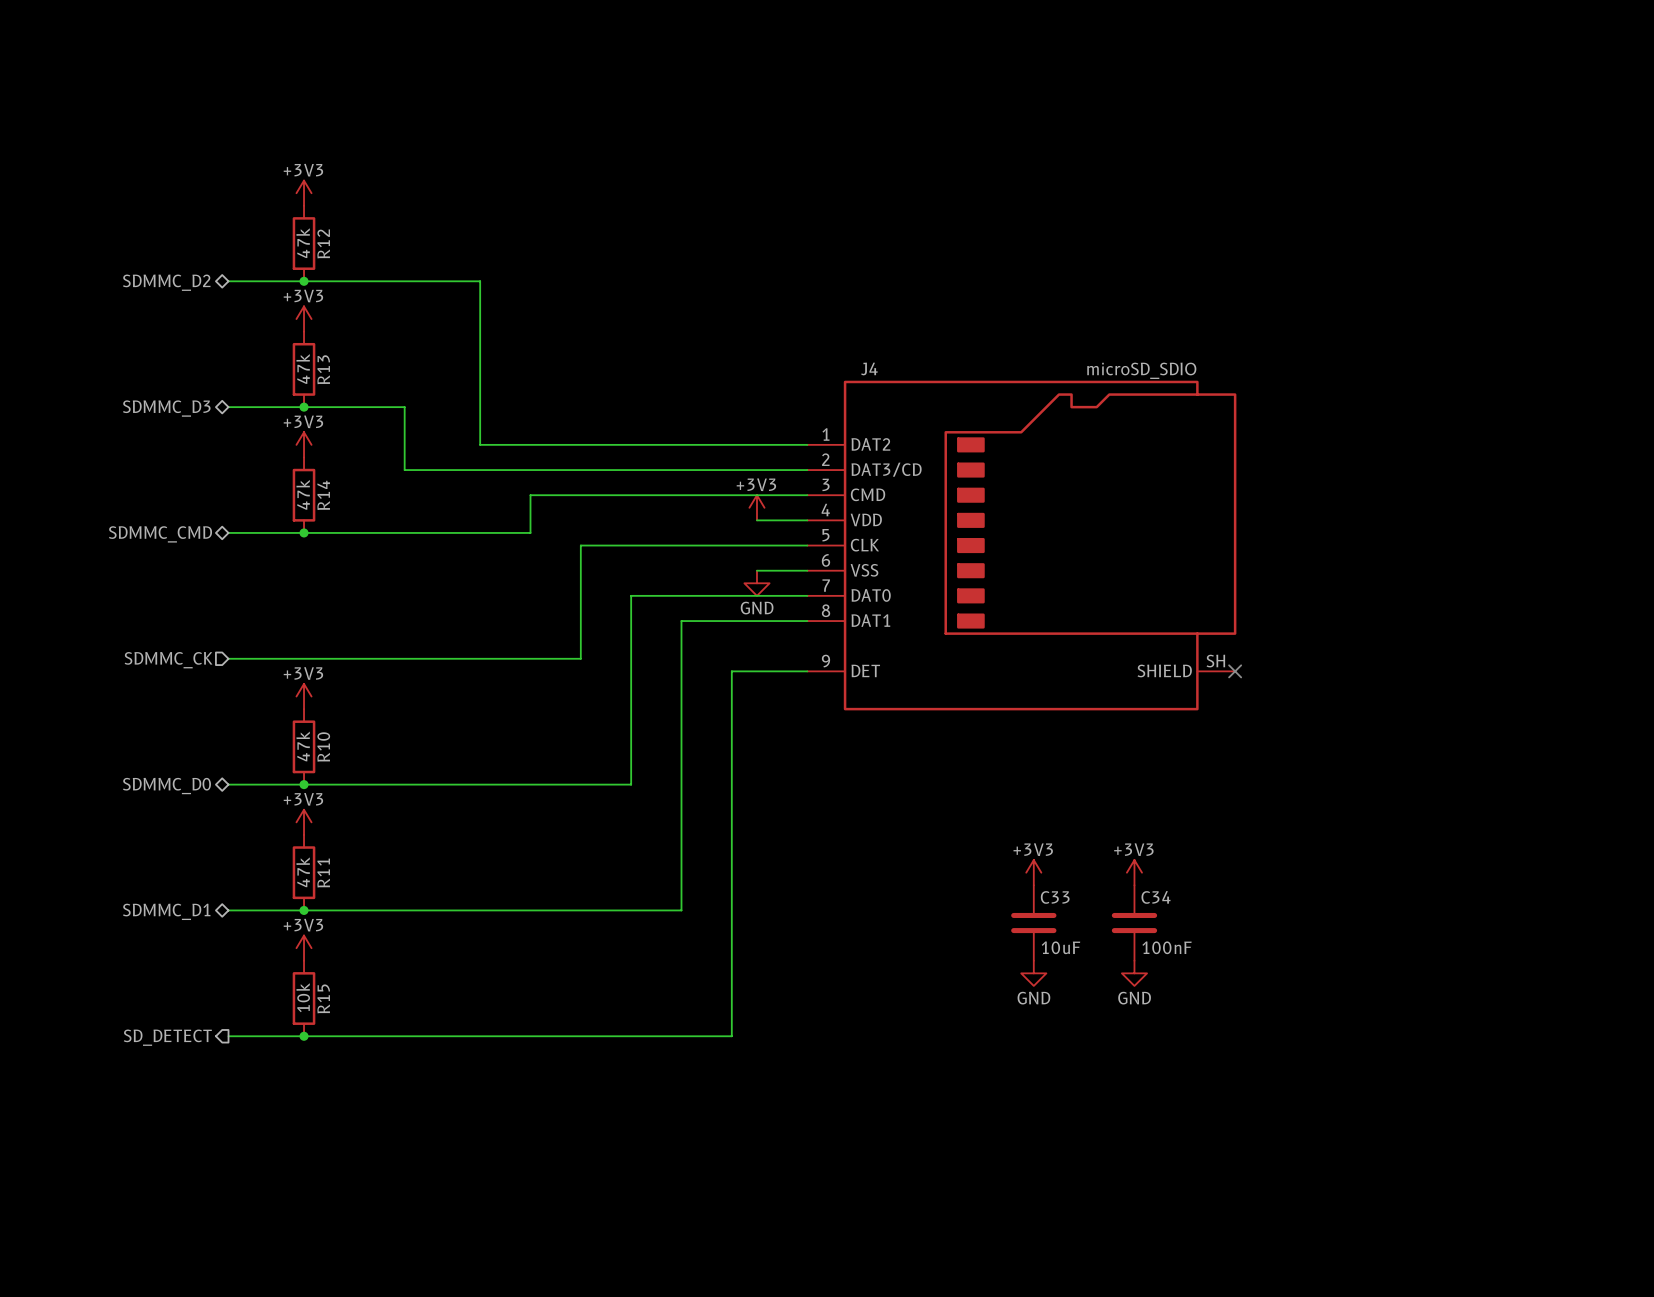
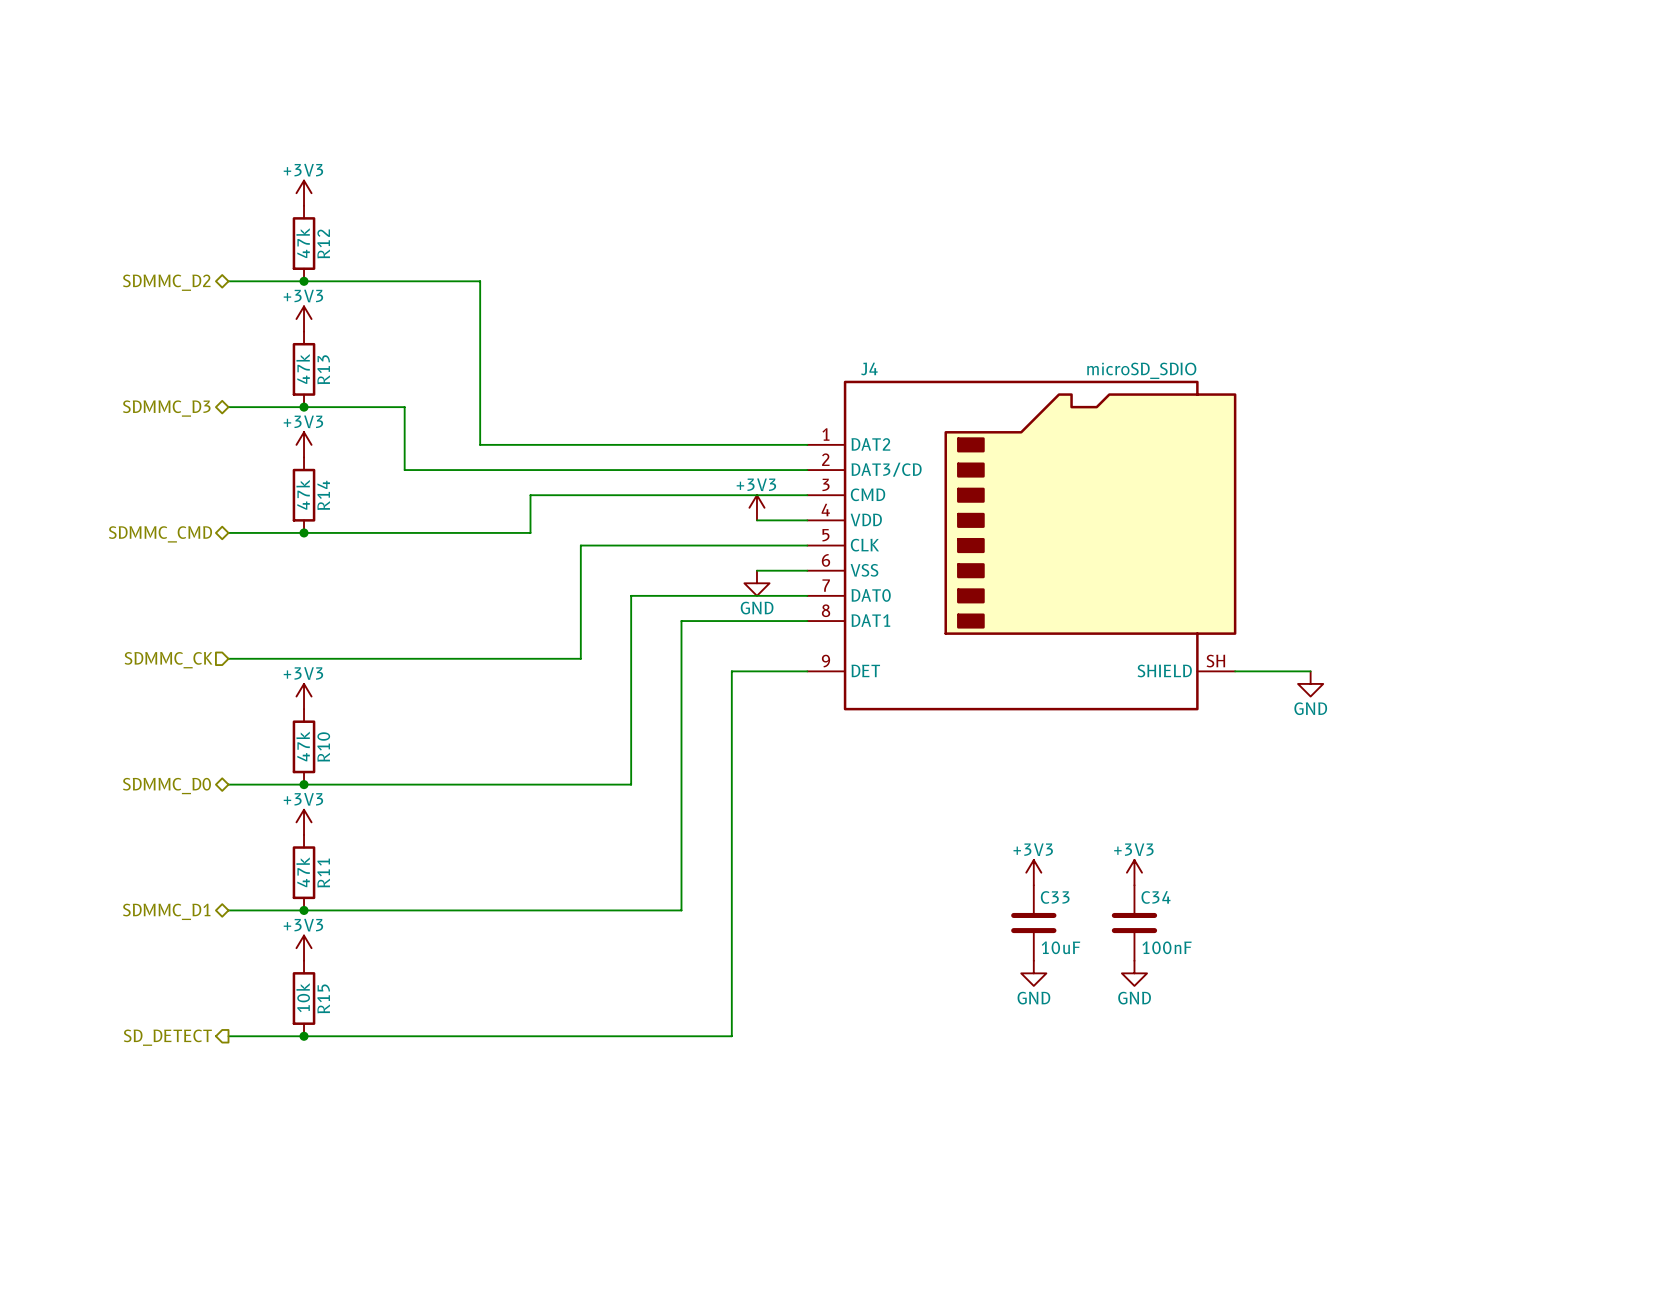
wire: none -> (1235, 671) (1310, 671)
no-connect mark: (1235, 671) -> none
power symbol: none -> GND (1310, 683)

